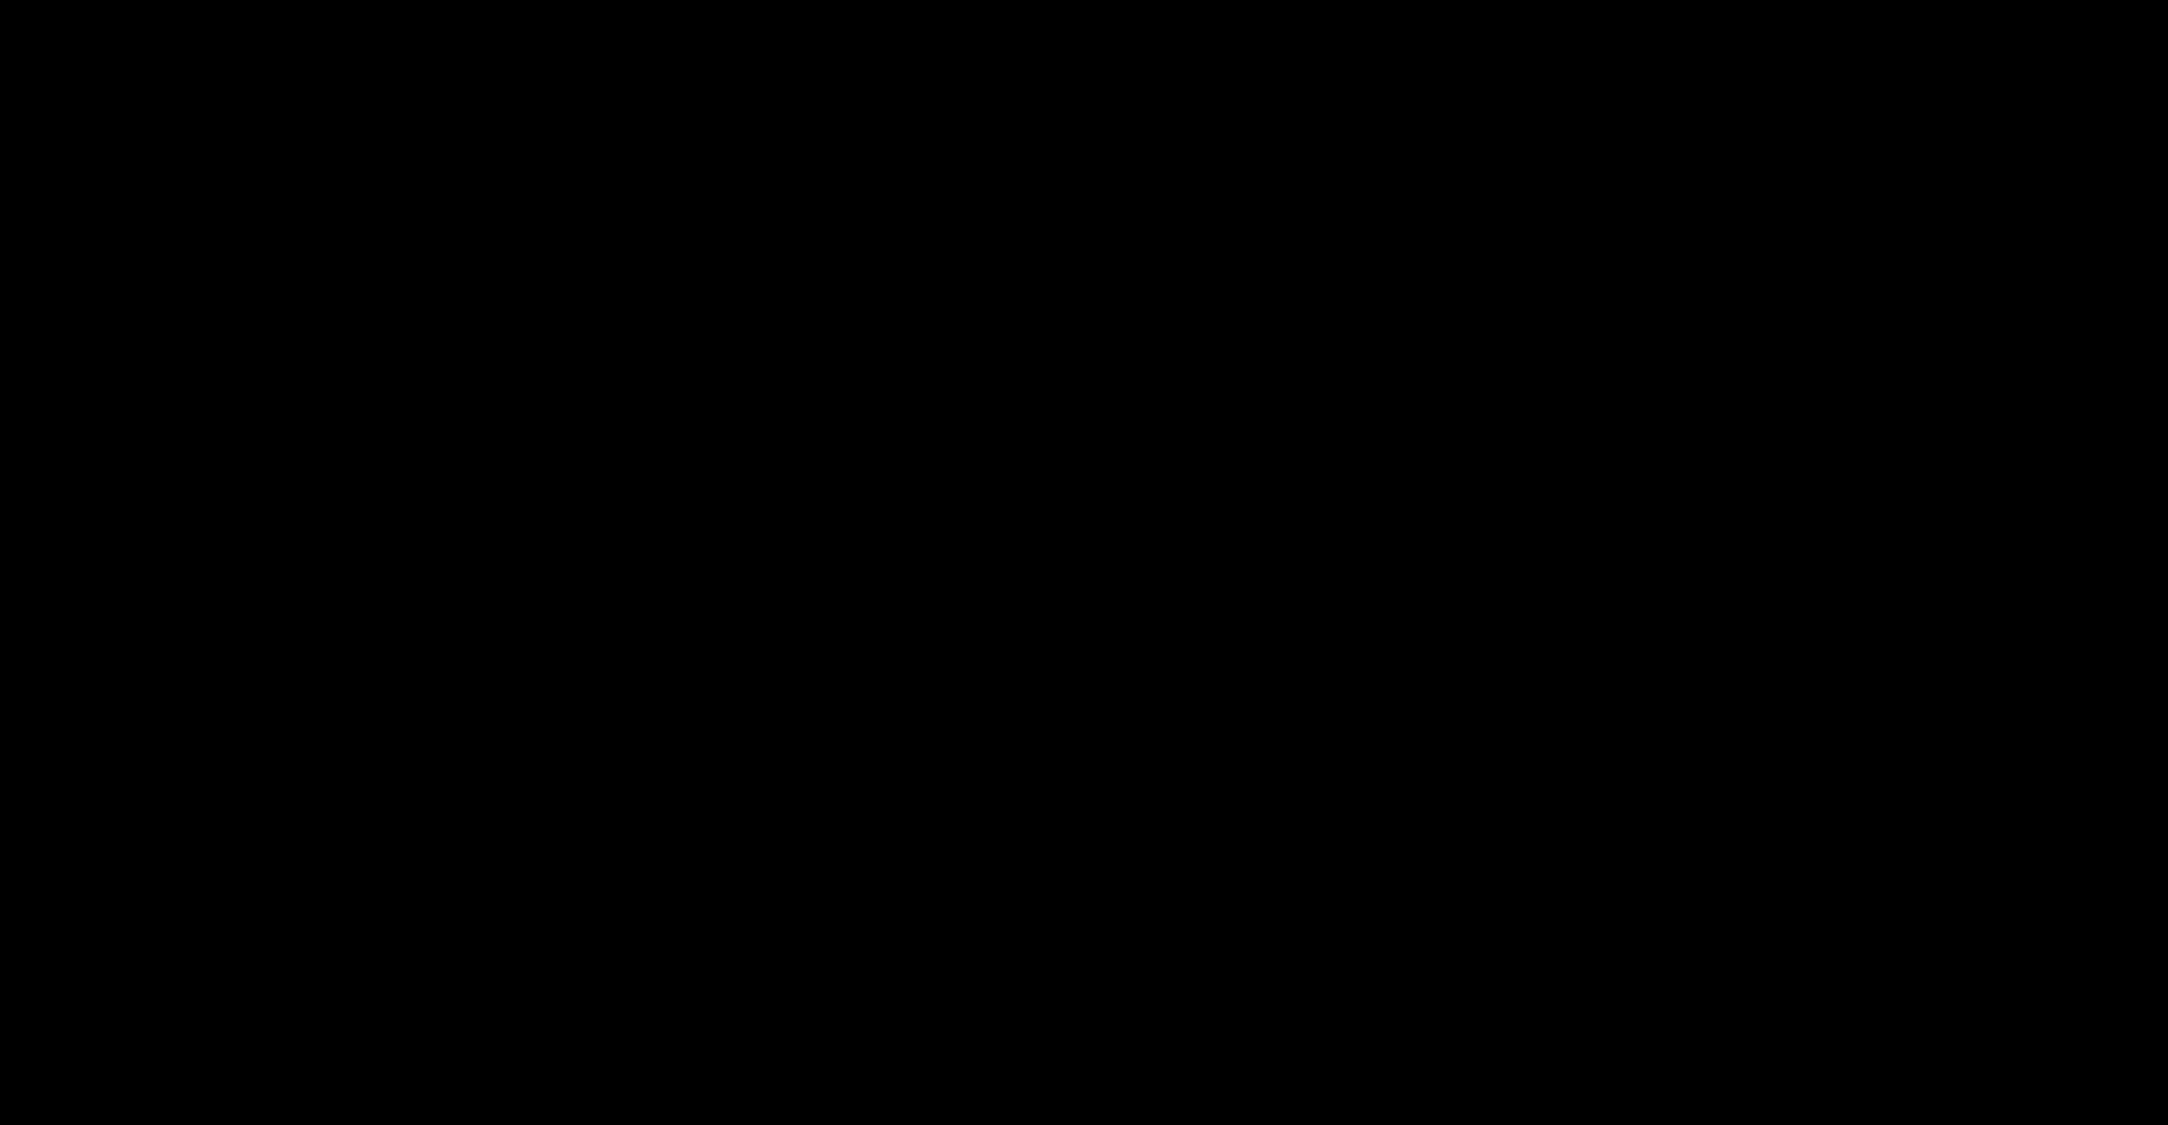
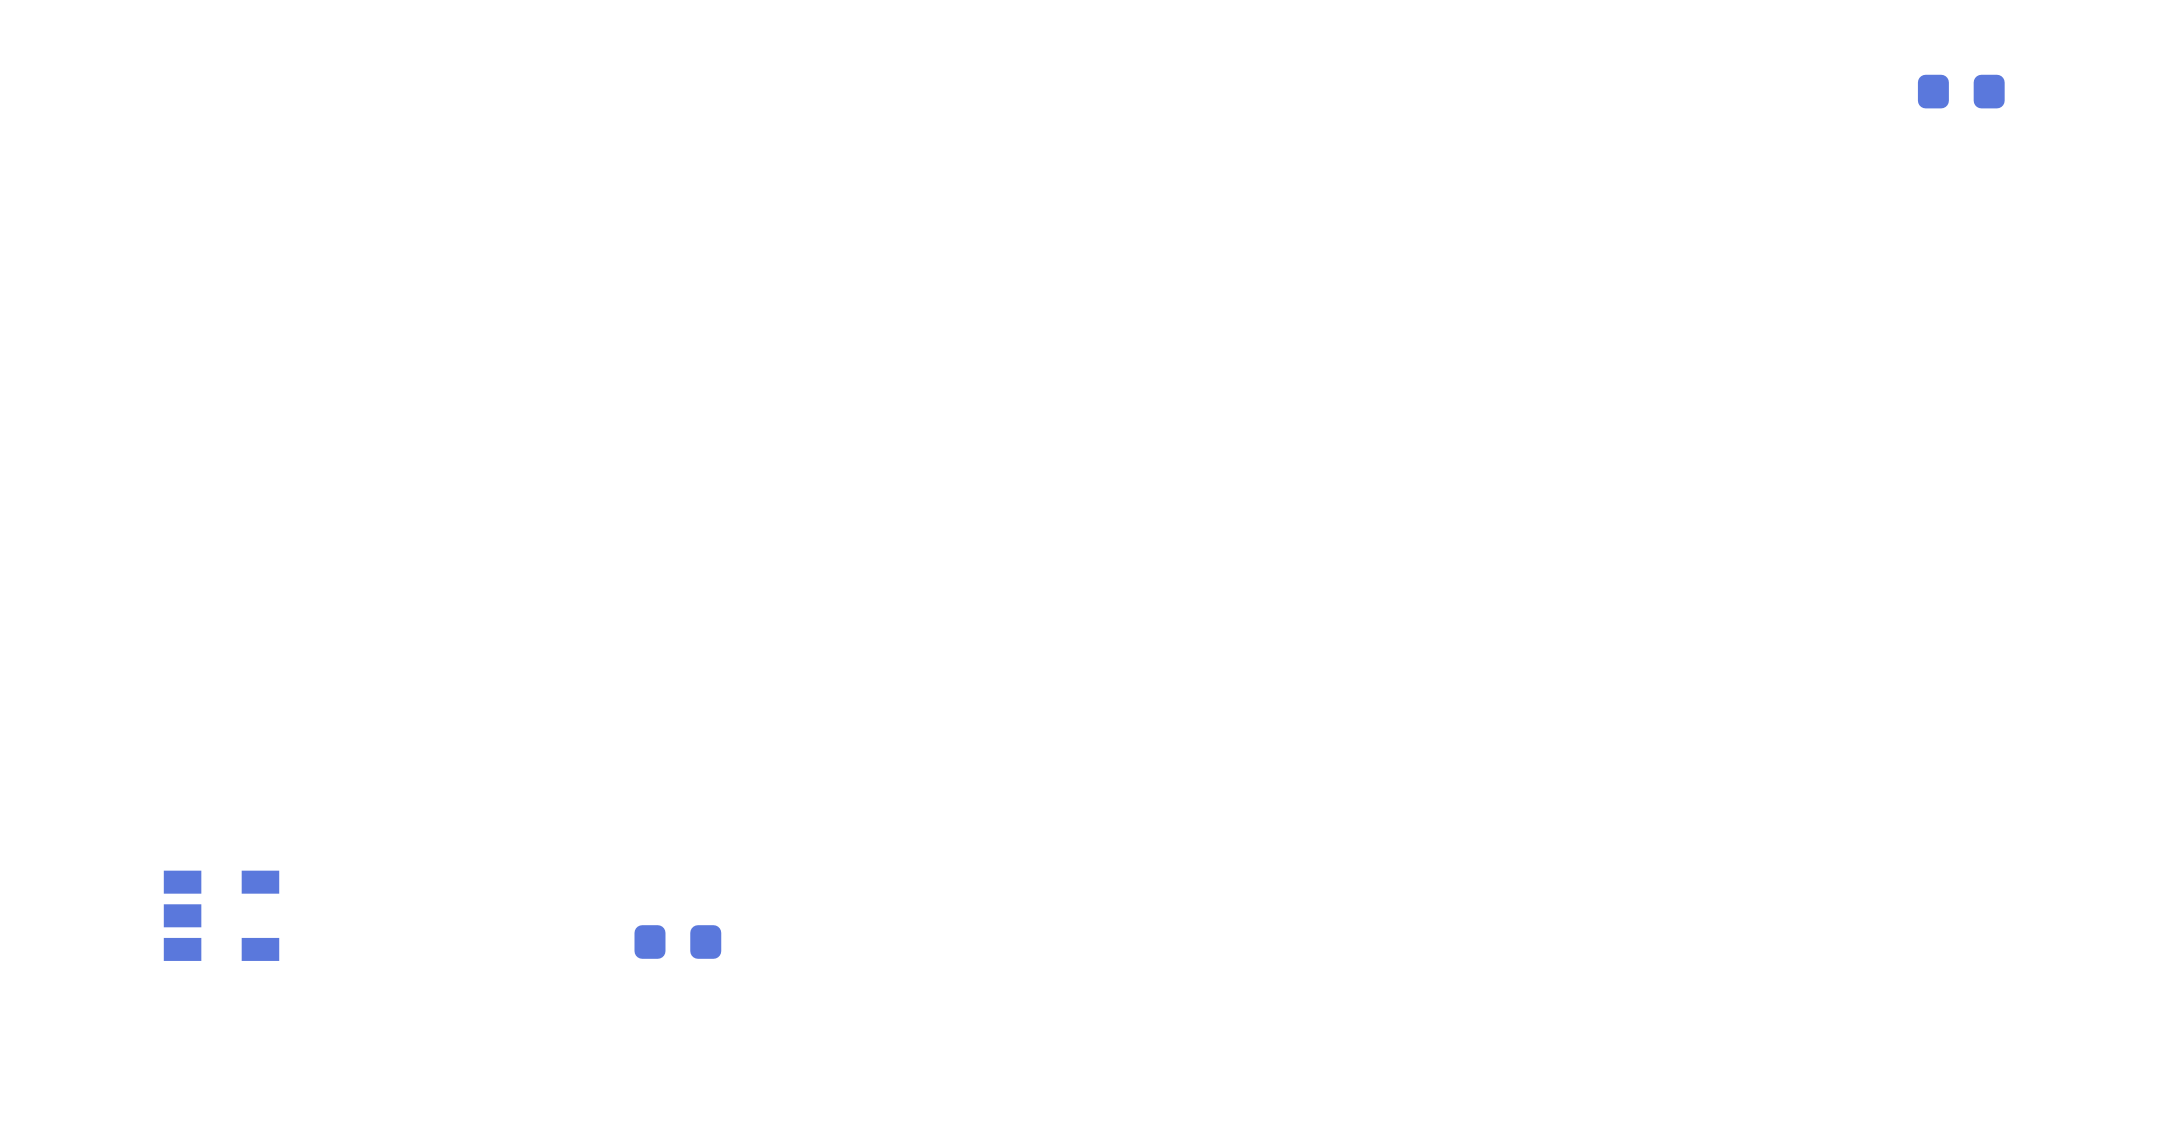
part: none -> (1961, 91)
part: none -> (221, 915)
part: none -> (677, 942)

